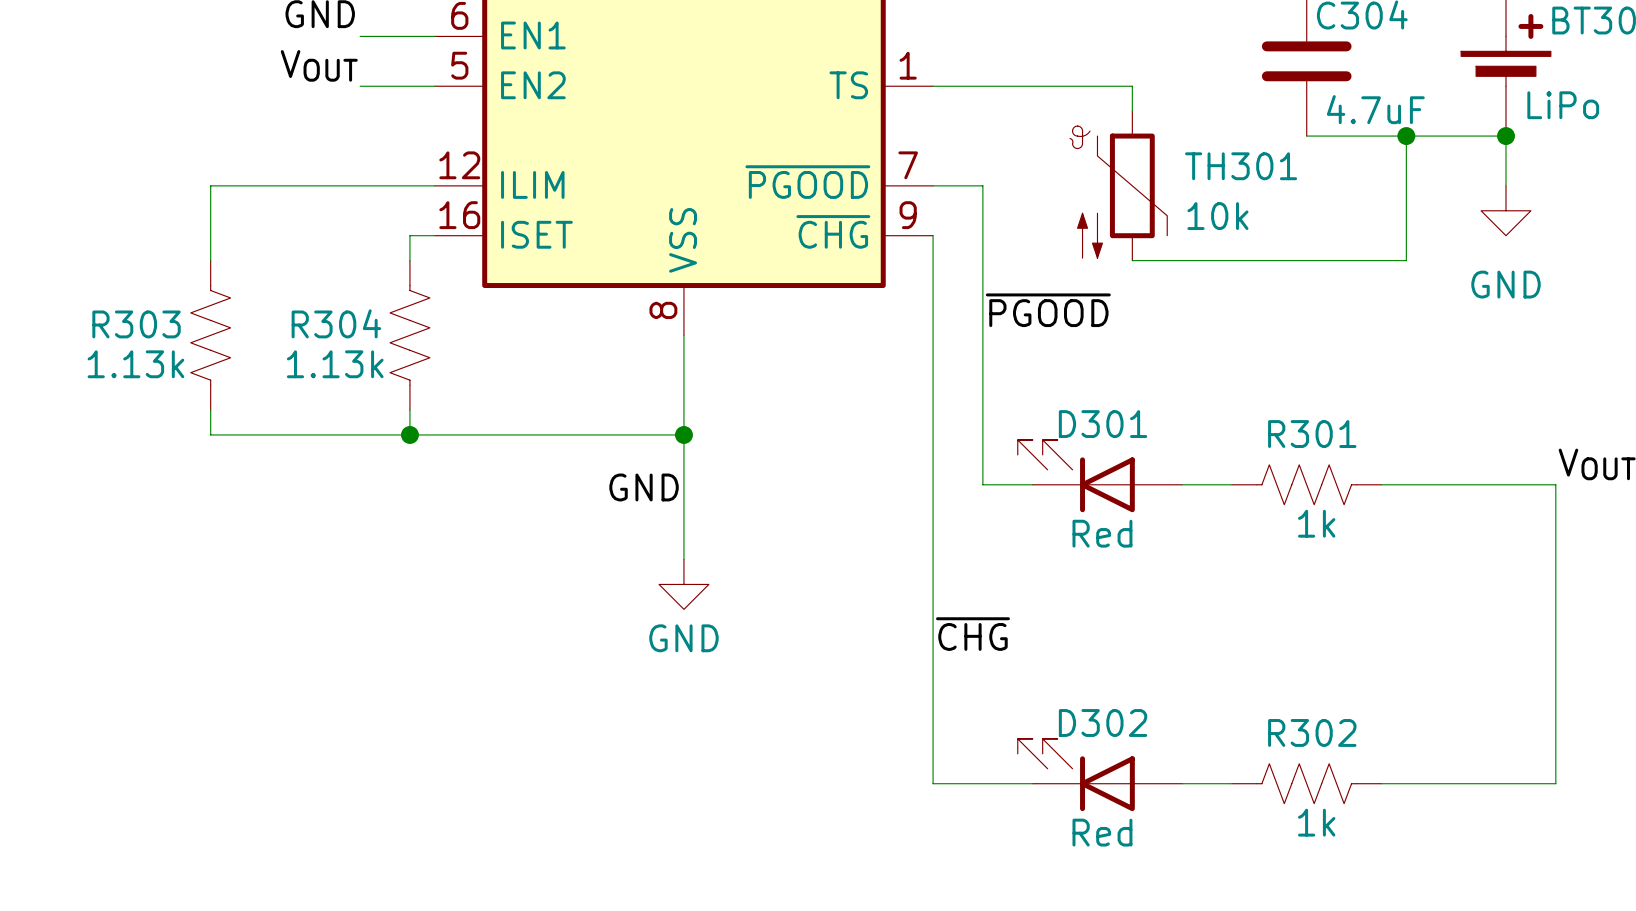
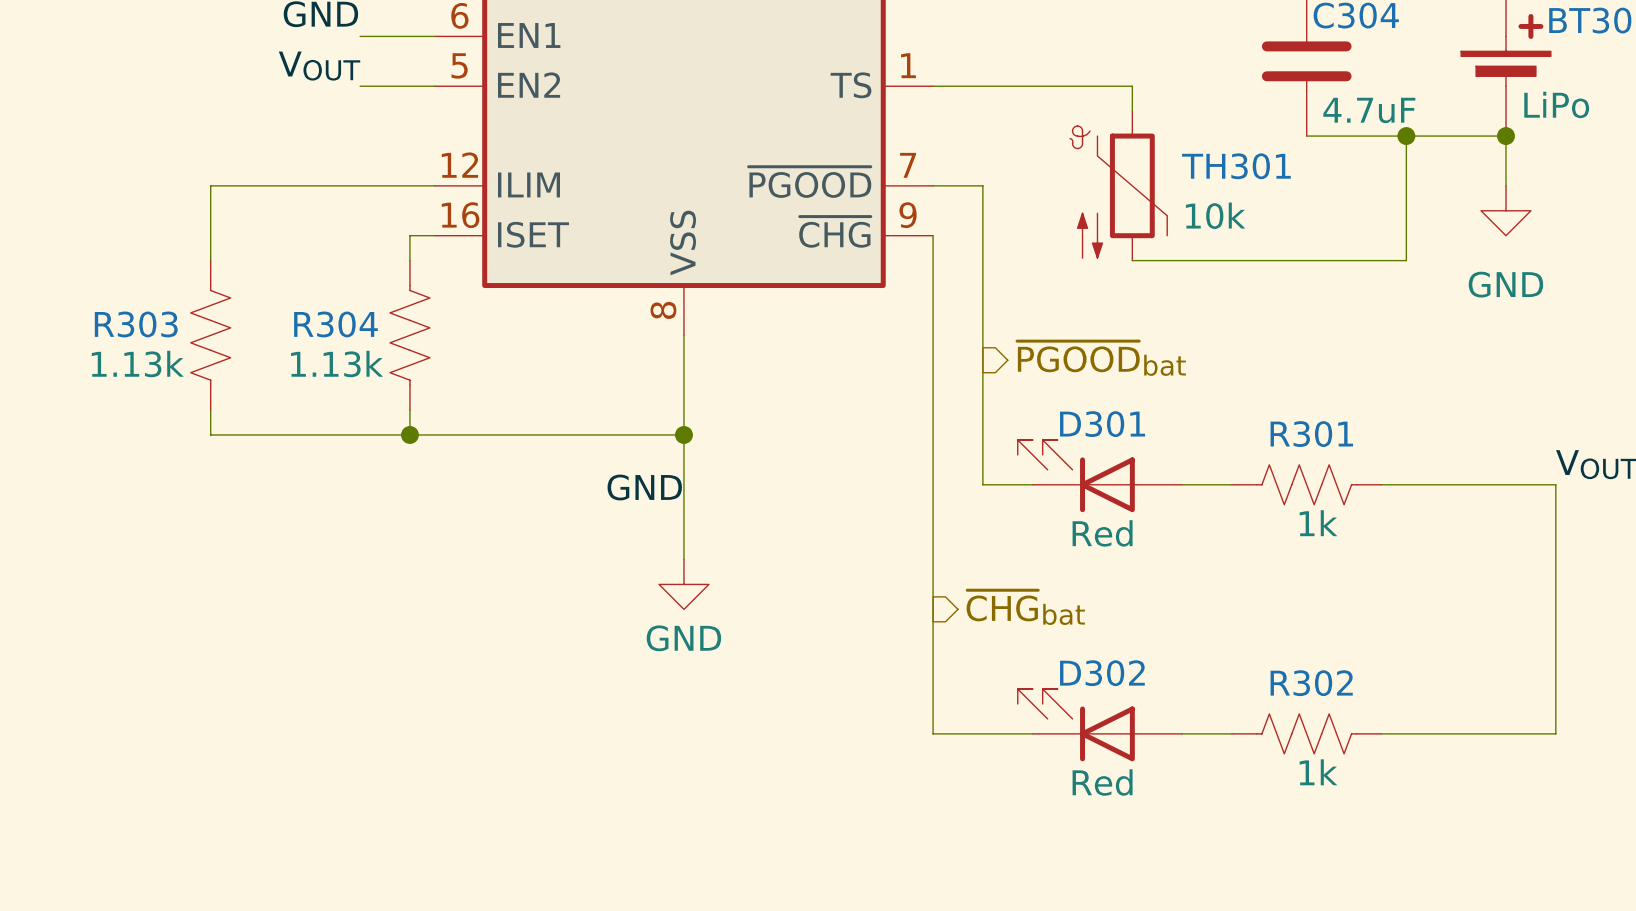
label: ~{PGOOD} (1048, 310) -> none
hierarchical label: none -> ~{PGOOD}bat (1101, 358)
hierarchical label: none -> ~{CHG}bat (1025, 607)
label: ~{CHG} (972, 634) -> none
wire: (933, 733) (933, 783) (1032, 783) -> (933, 733) (1032, 733)
wire: (1555, 733) (1555, 783) (1381, 783) -> (1555, 733) (1381, 733)
D302 position: (1099, 775) -> (1099, 725)
wire: (1182, 783) (1231, 783) -> (1182, 733) (1231, 733)
R302 position: (1306, 783) -> (1306, 733)

